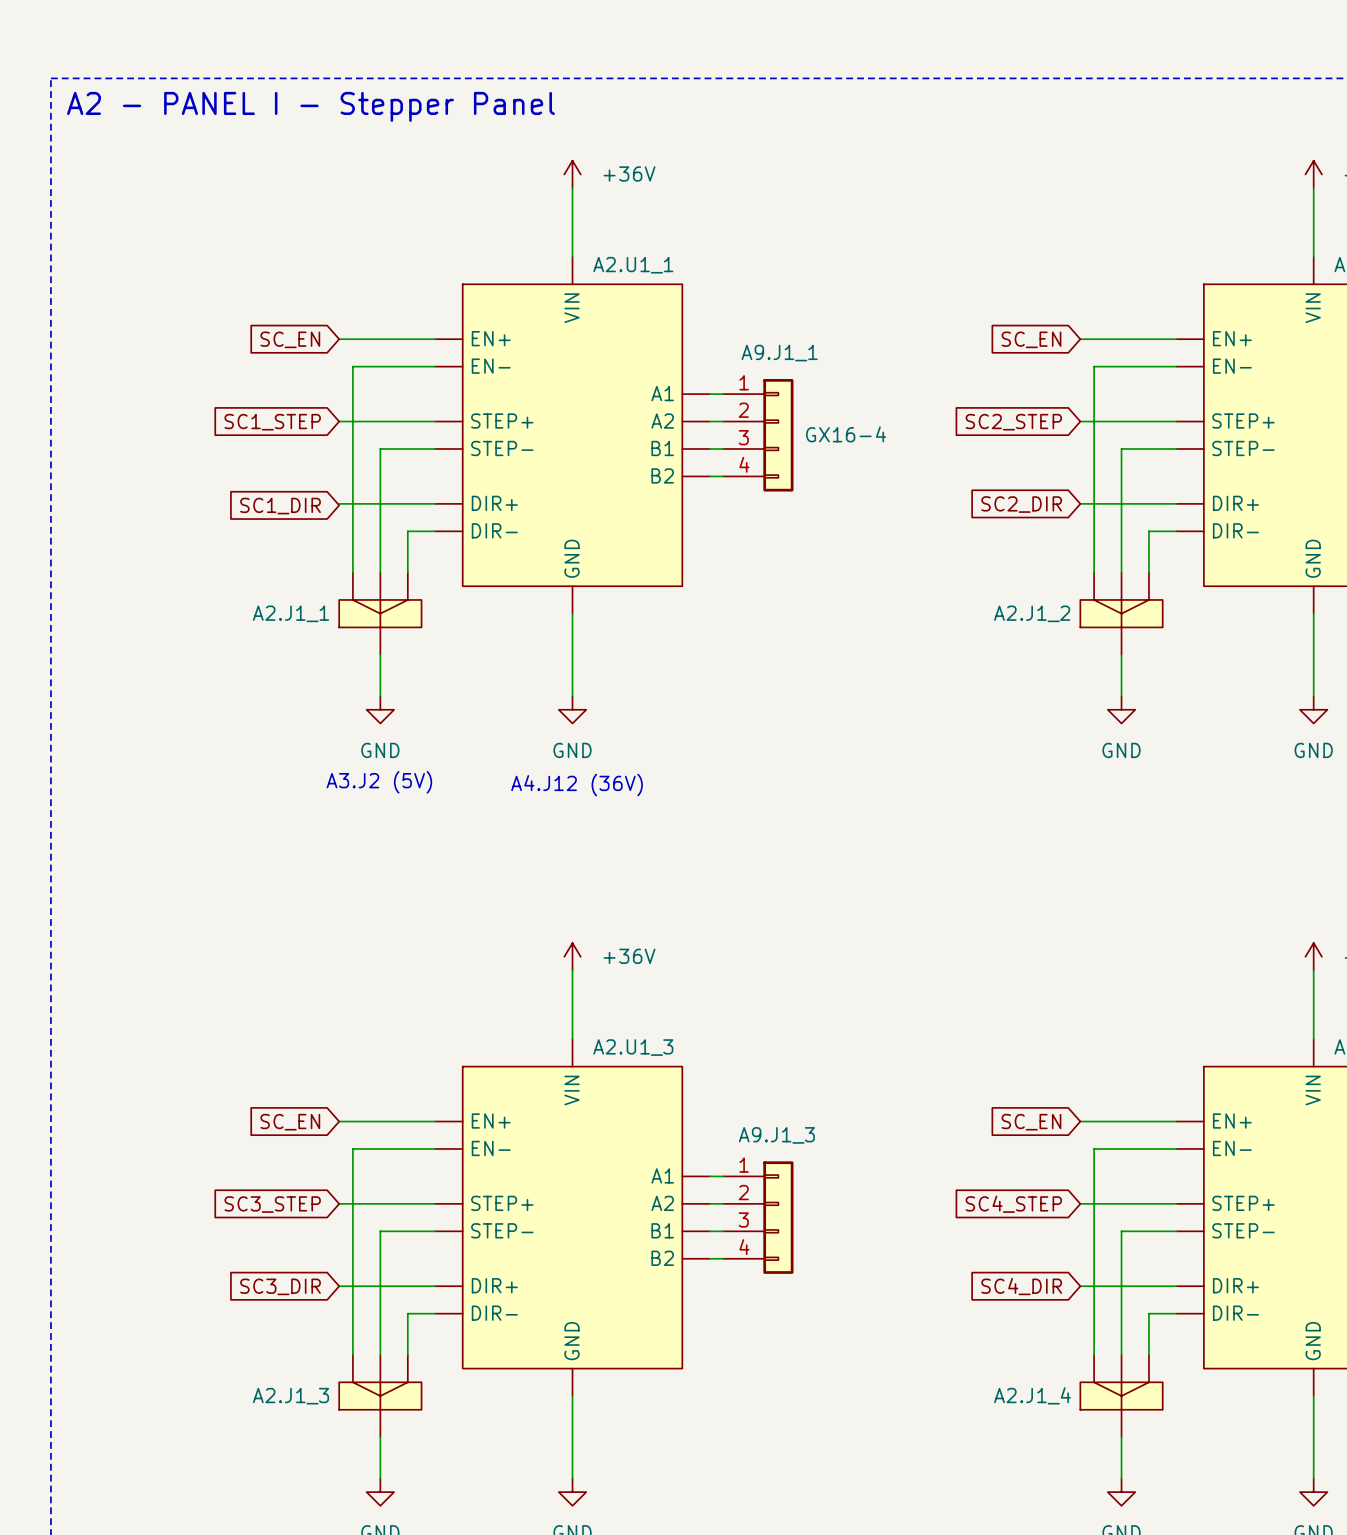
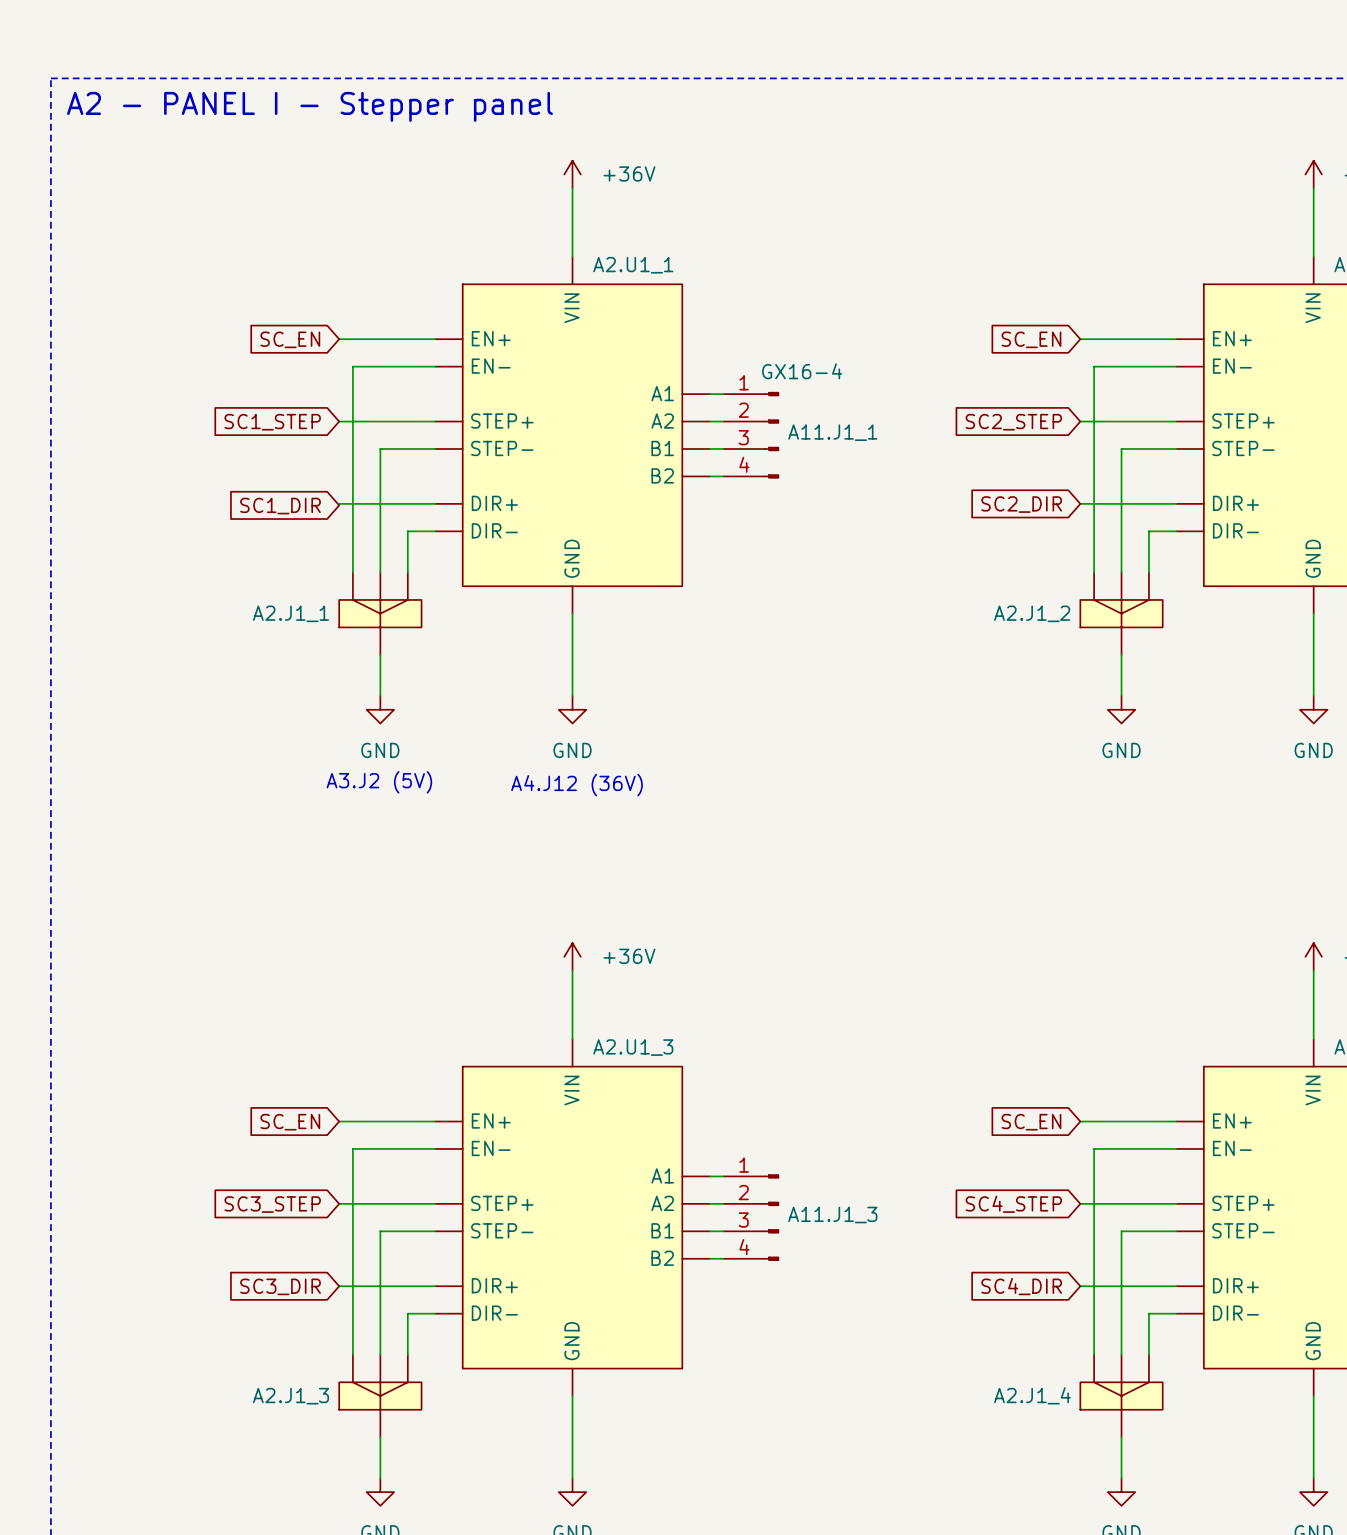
text: A2 - PANEL I - Stepper Panel (310, 106) -> A2 - PANEL I - Stepper panel (310, 106)
A11.J1_1: none -> GX16-4 (751, 435)
A9.J1_1: GX16-4 (758, 435) -> none
A11.J1_3: none -> (751, 1217)
A9.J1_3: (758, 1217) -> none

